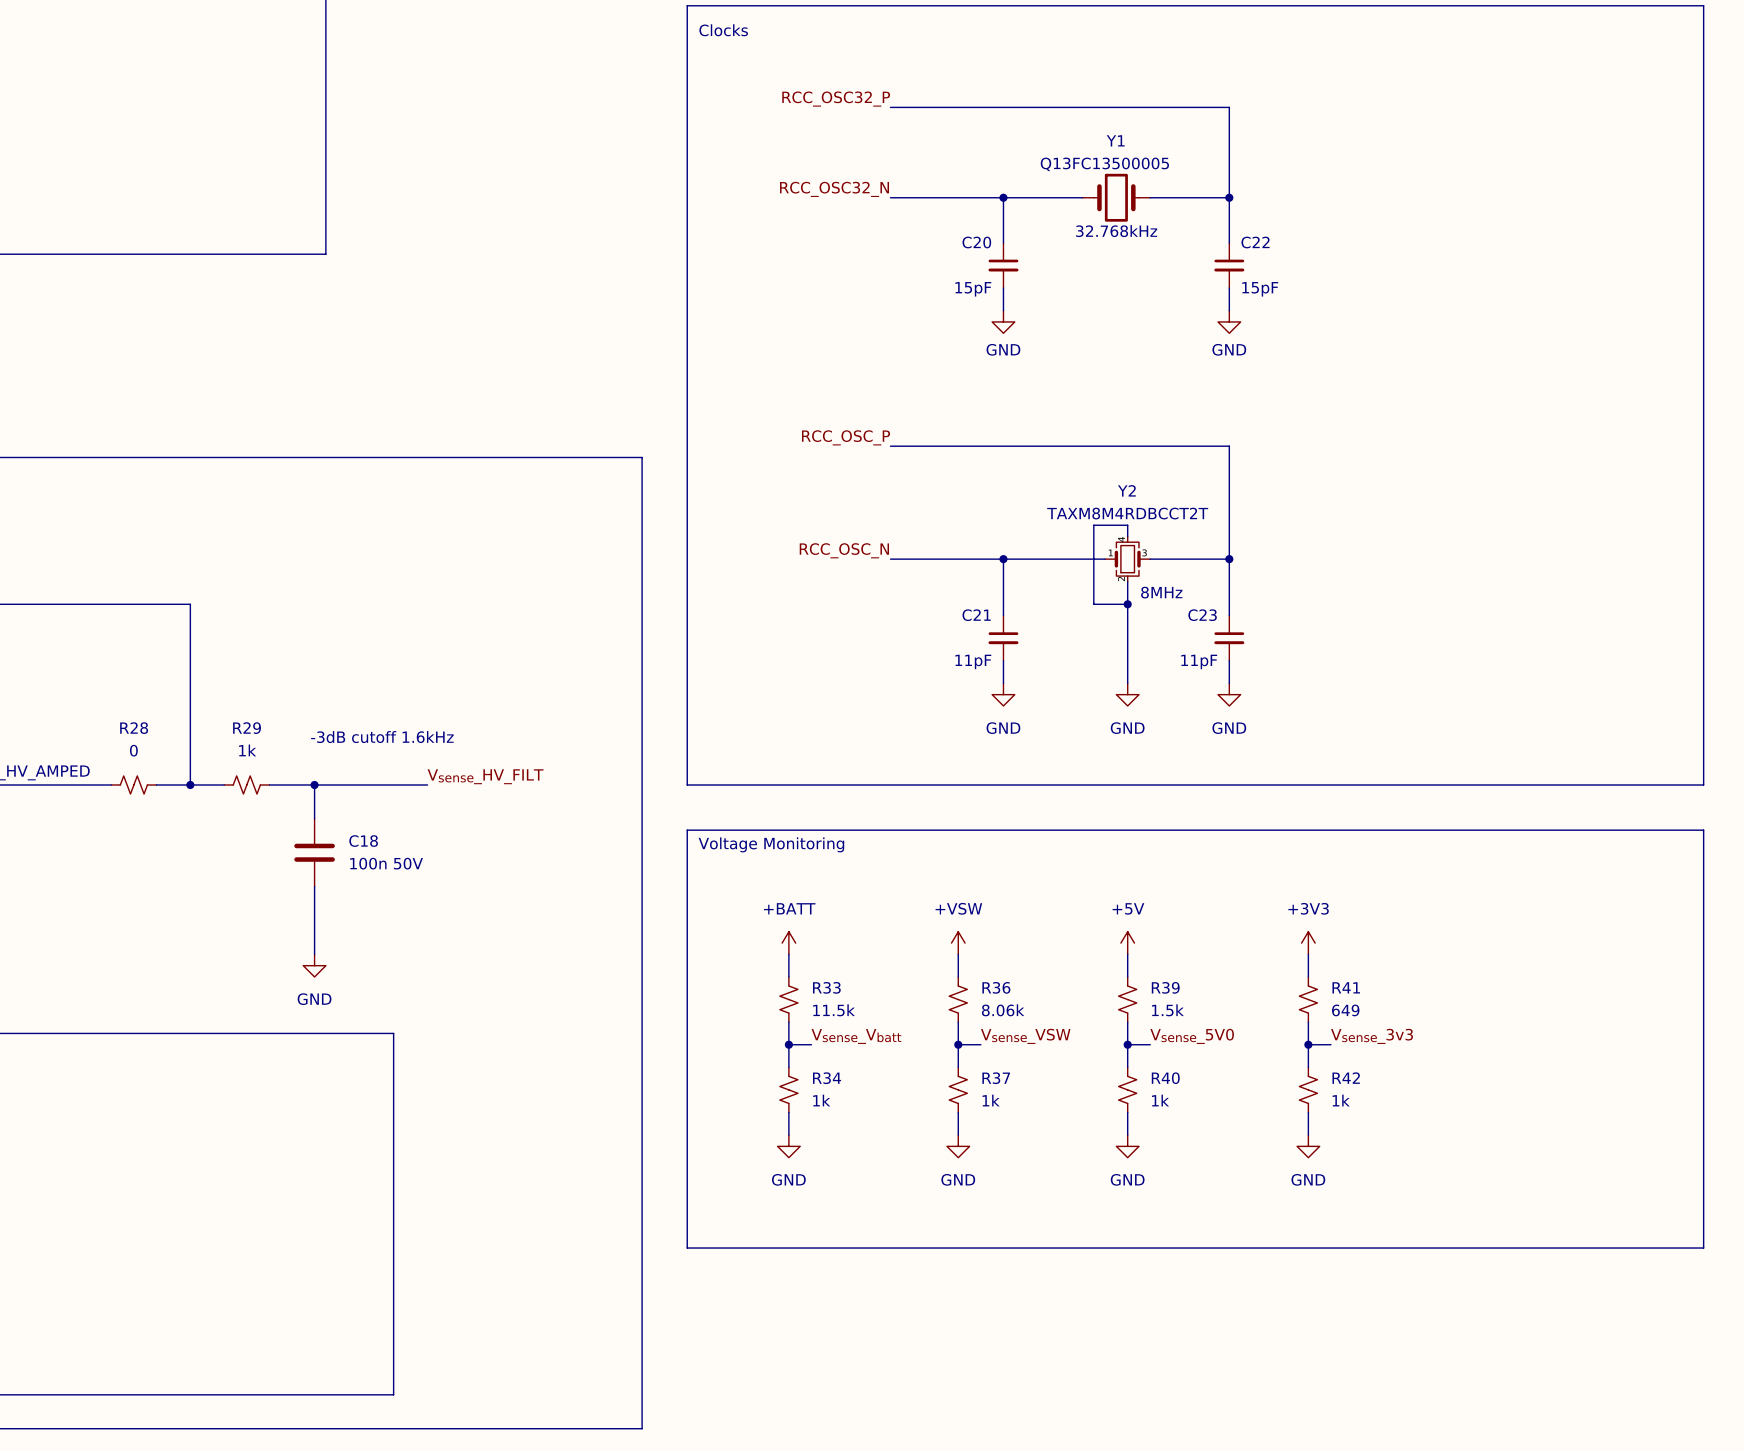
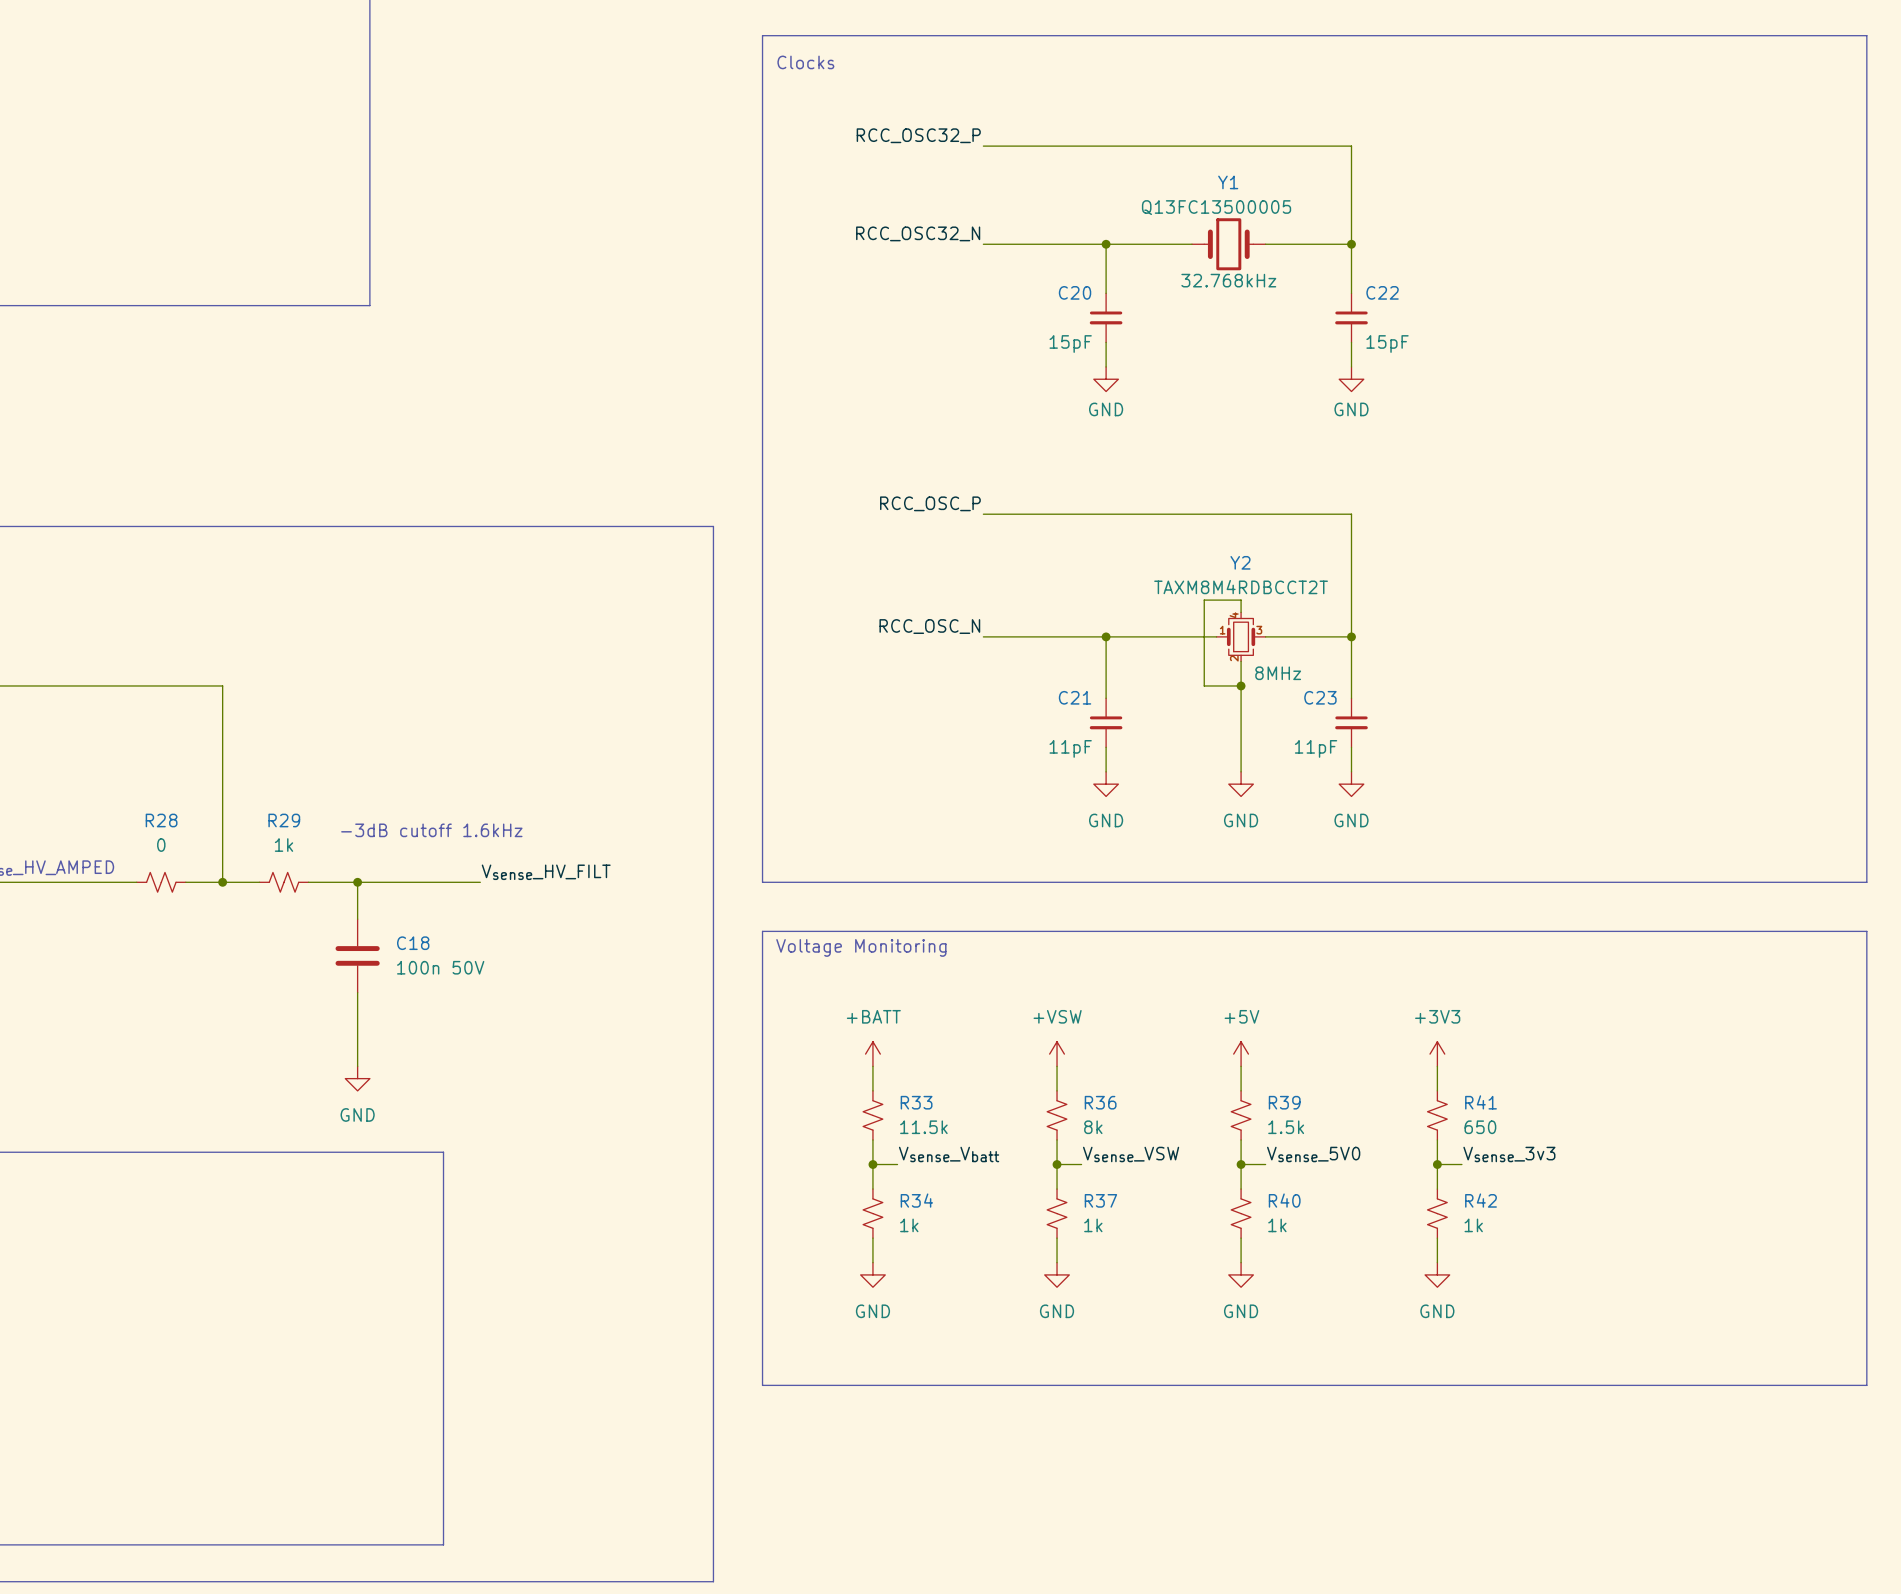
R36 value: 8.06k (1003, 1010) -> 8k (1093, 1127)
R41 value: 649 (1345, 1010) -> 650 (1480, 1127)

